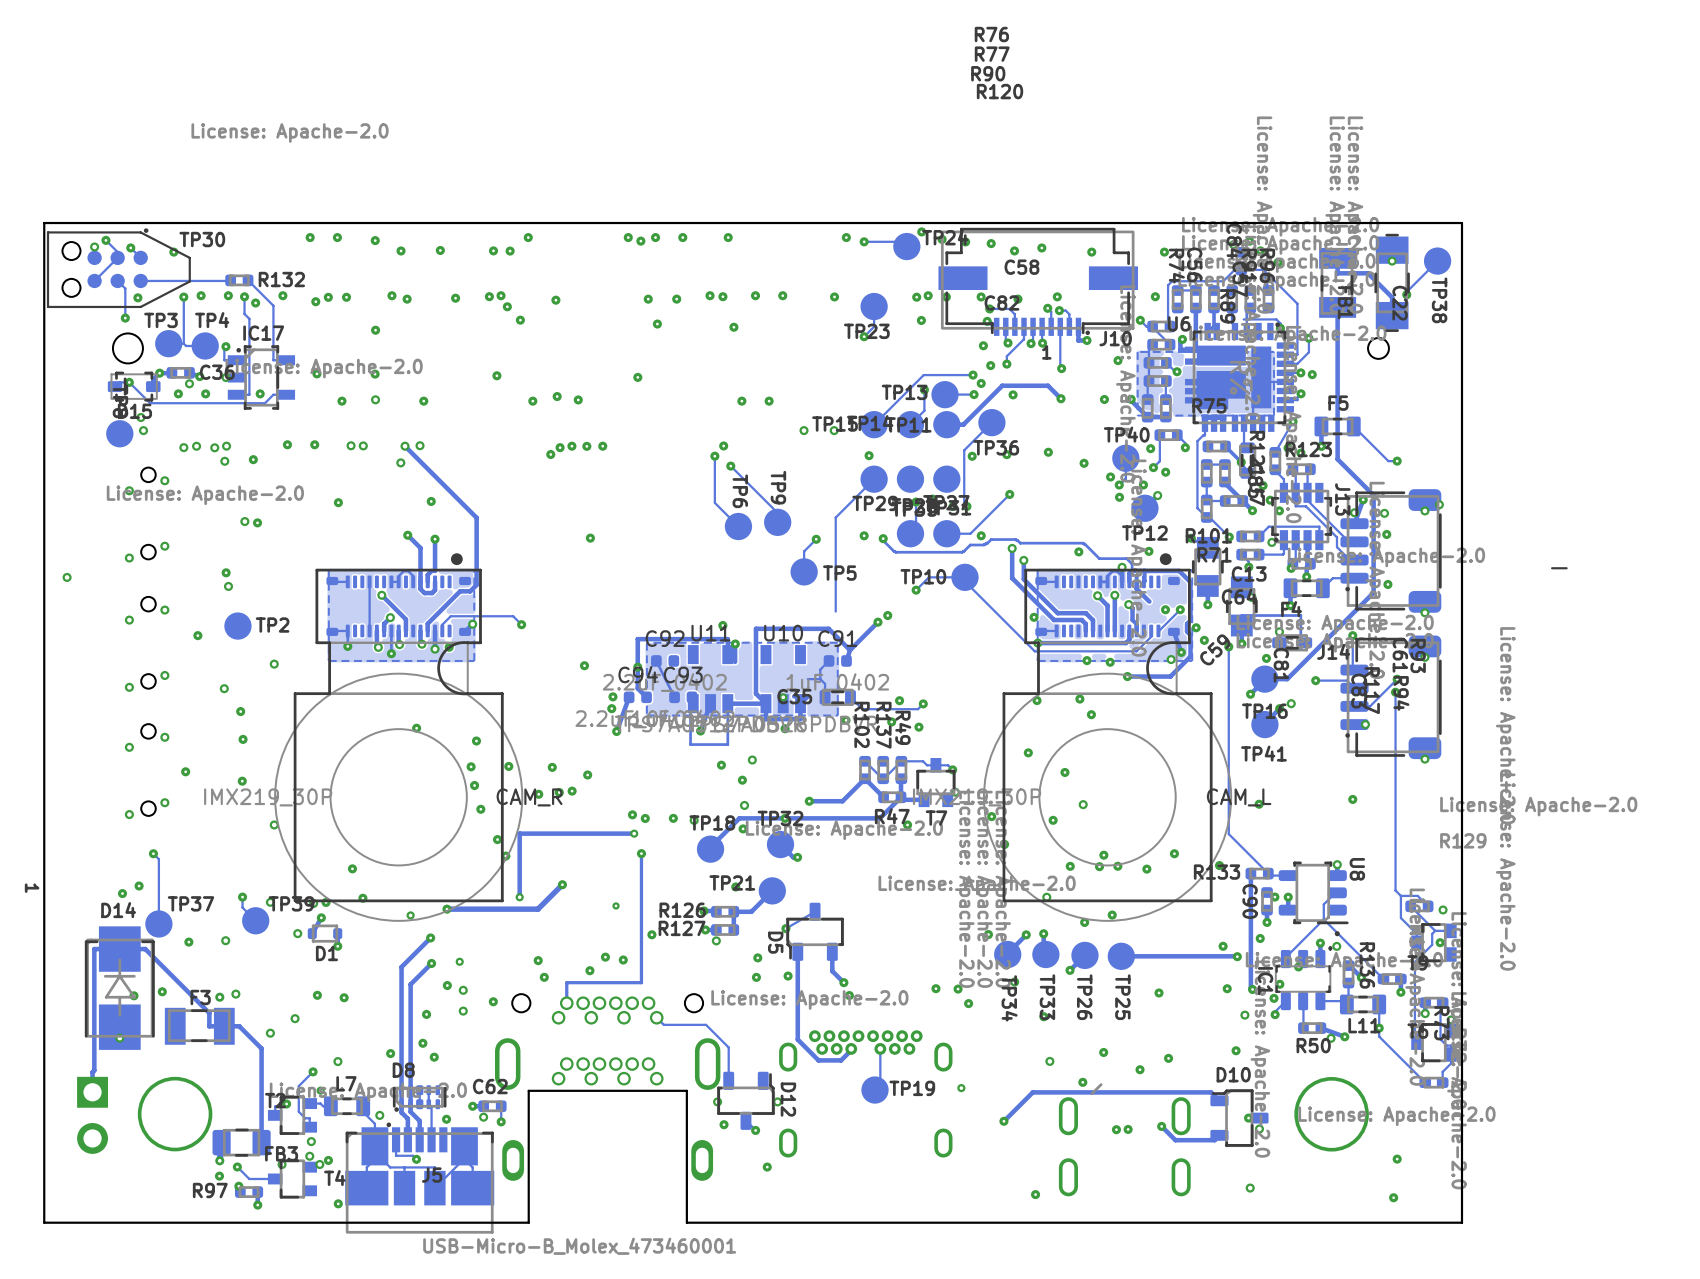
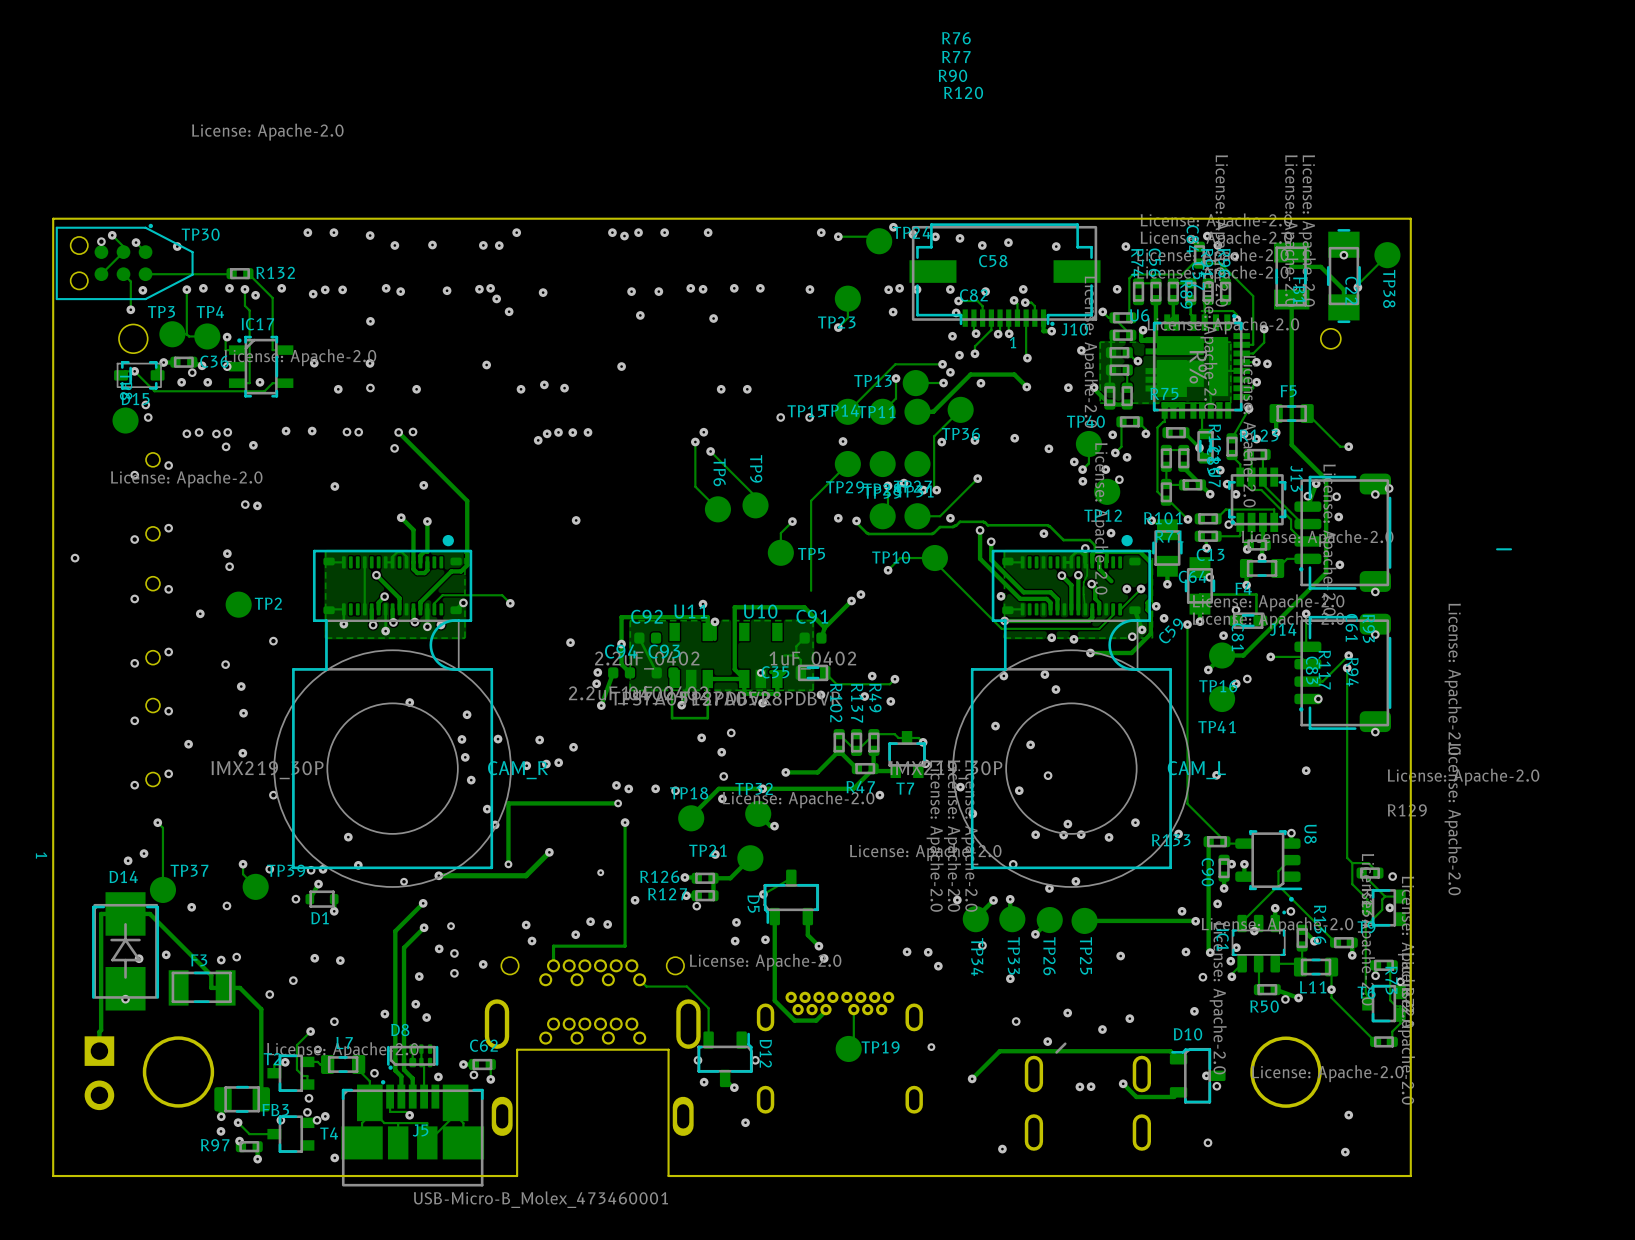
track: none -> (1085, 562) (1087, 564) (1087, 575) (1083, 582) (1085, 609)

